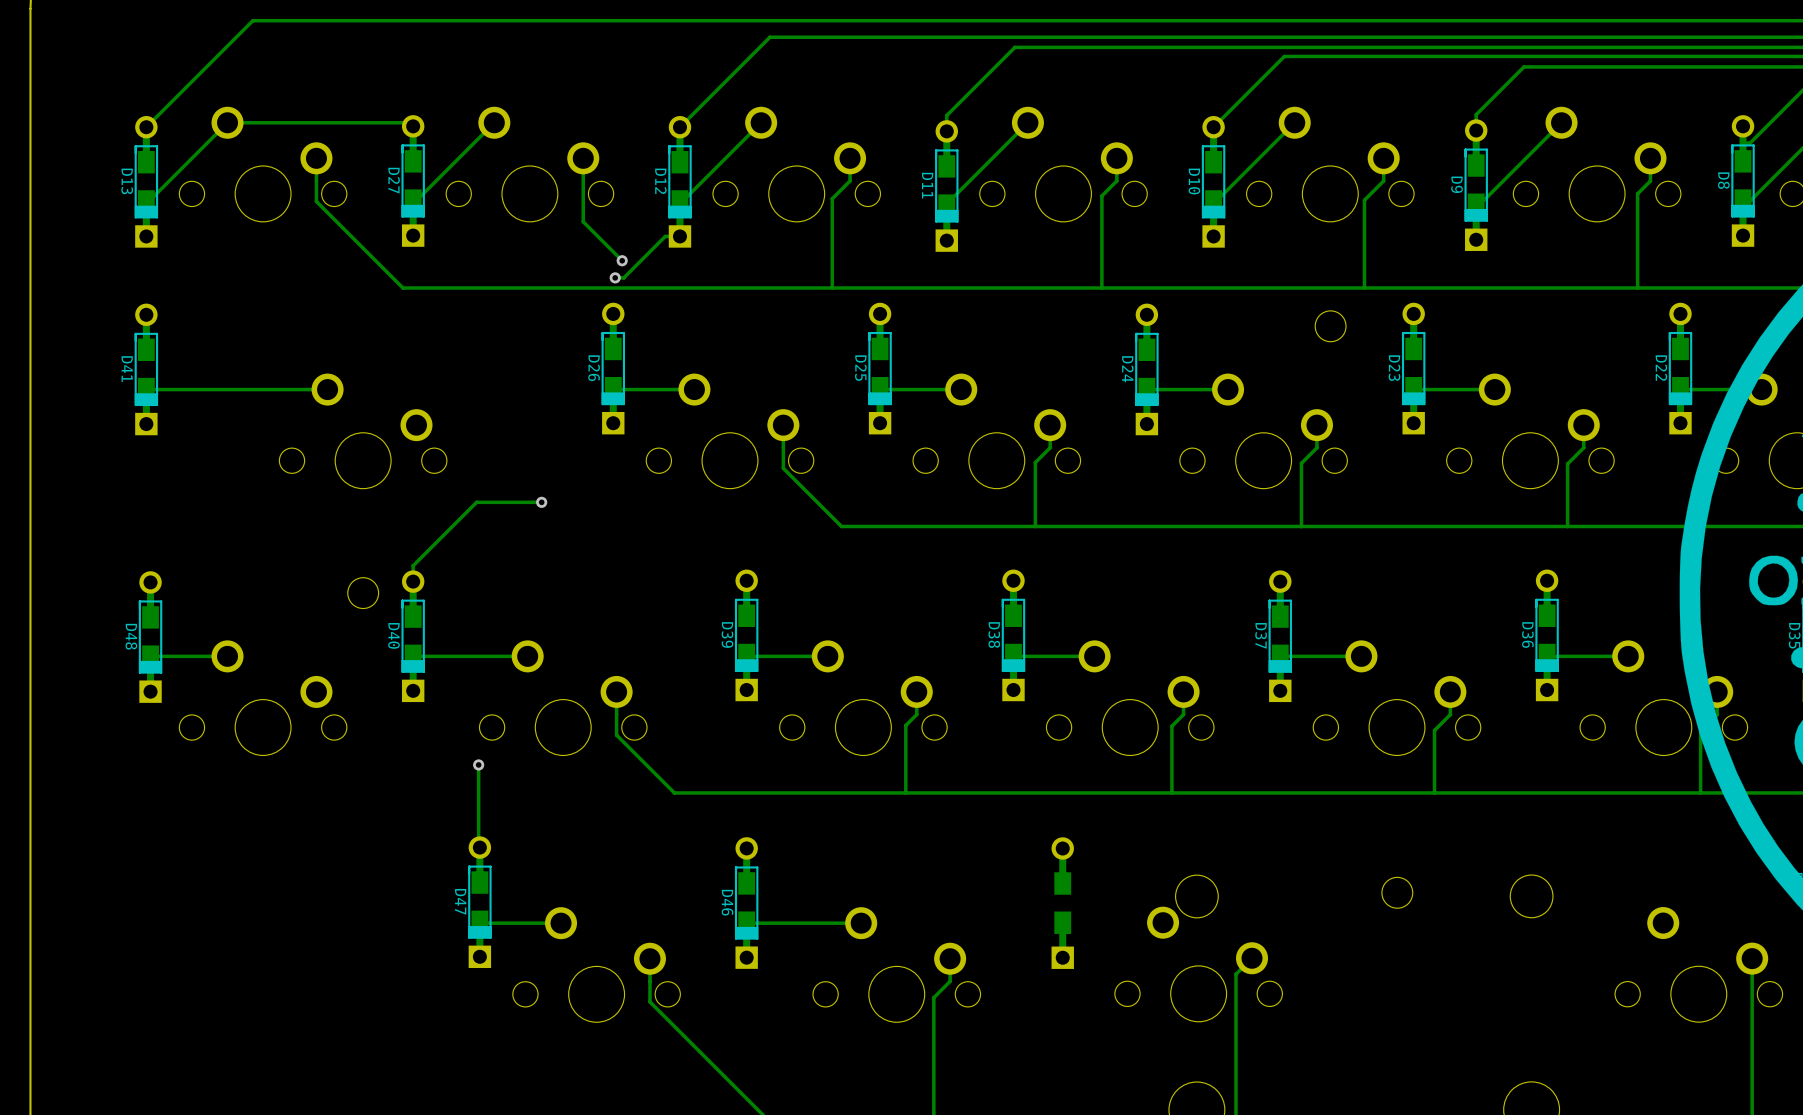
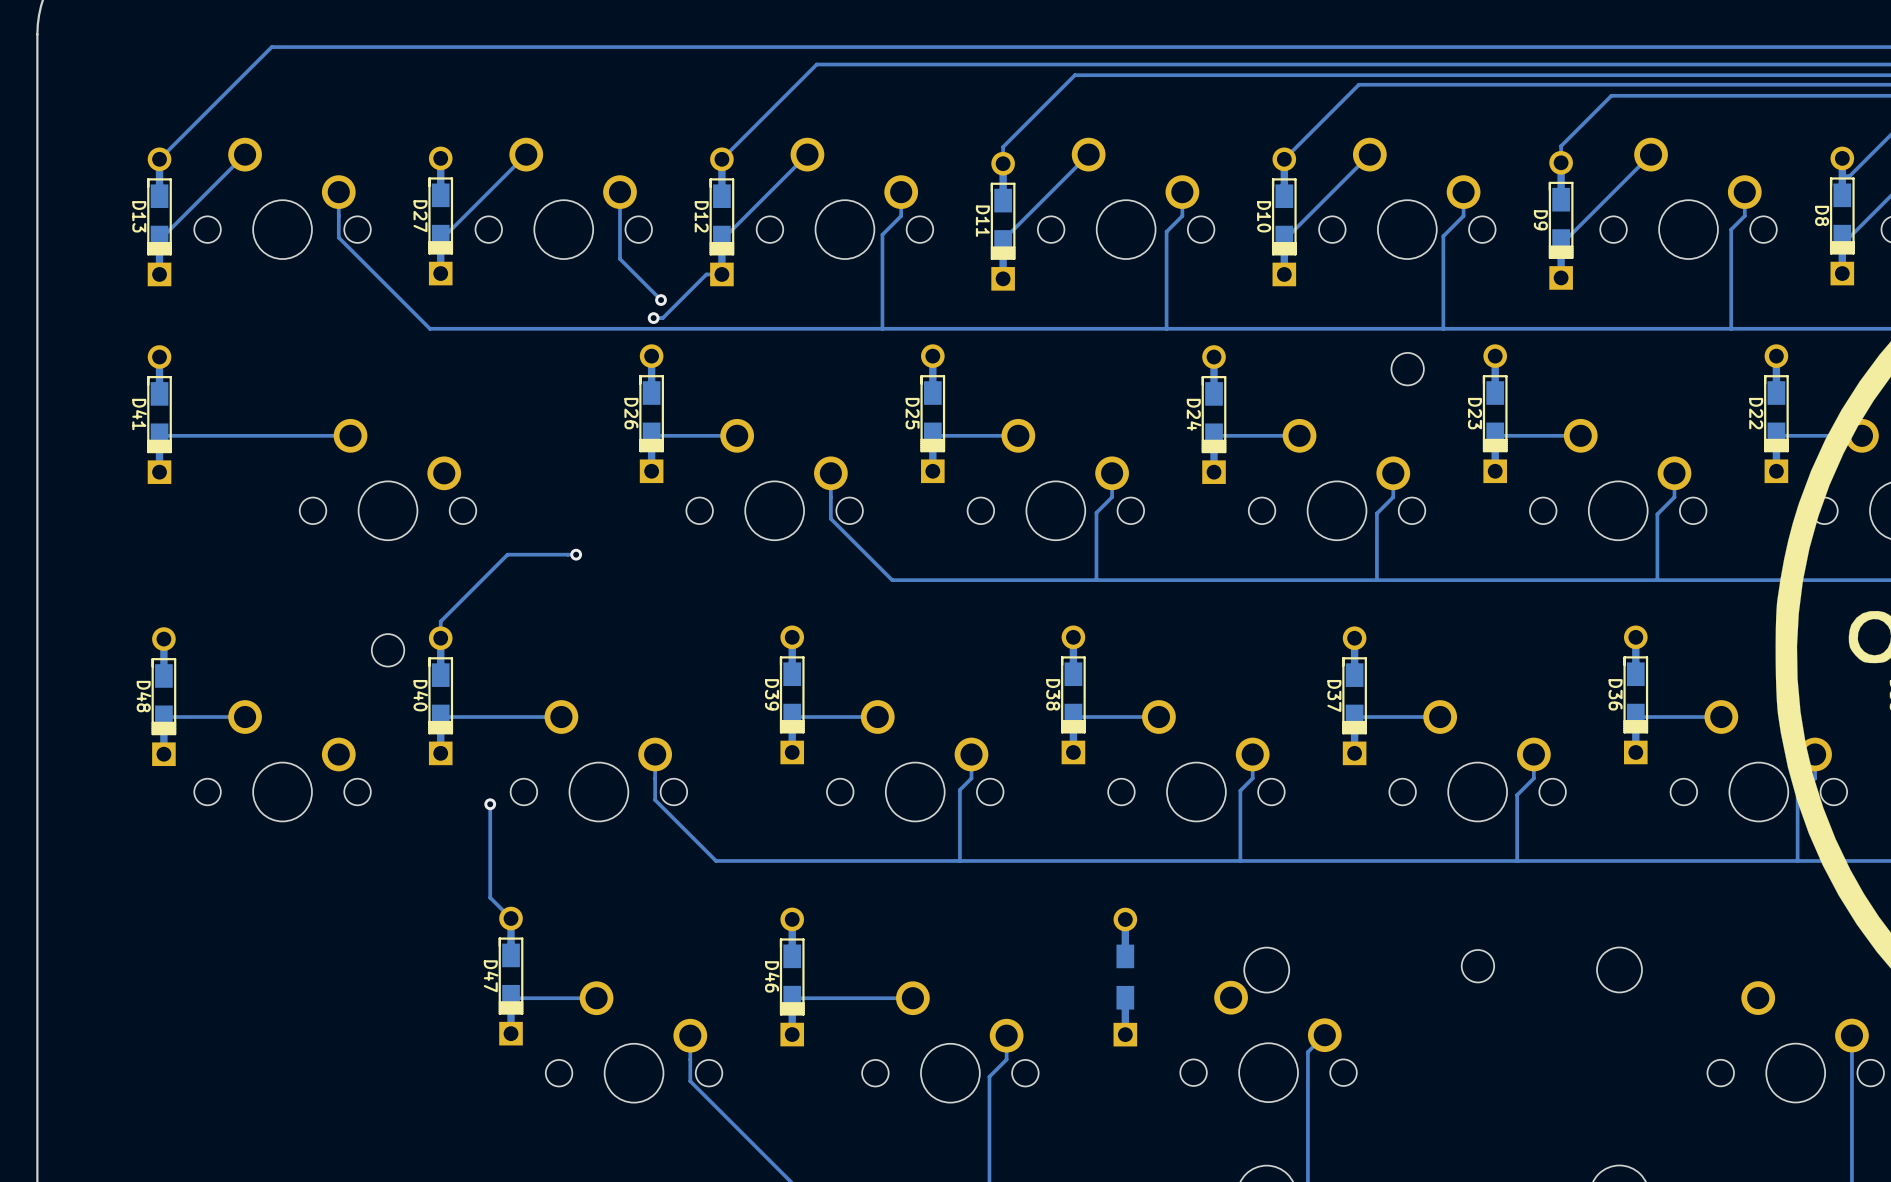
track: (409, 122) (227, 122) -> none
track: (478, 764) (478, 846) -> (490, 804) (490, 897) (509, 917)
via position: (478, 764) -> (490, 804)

